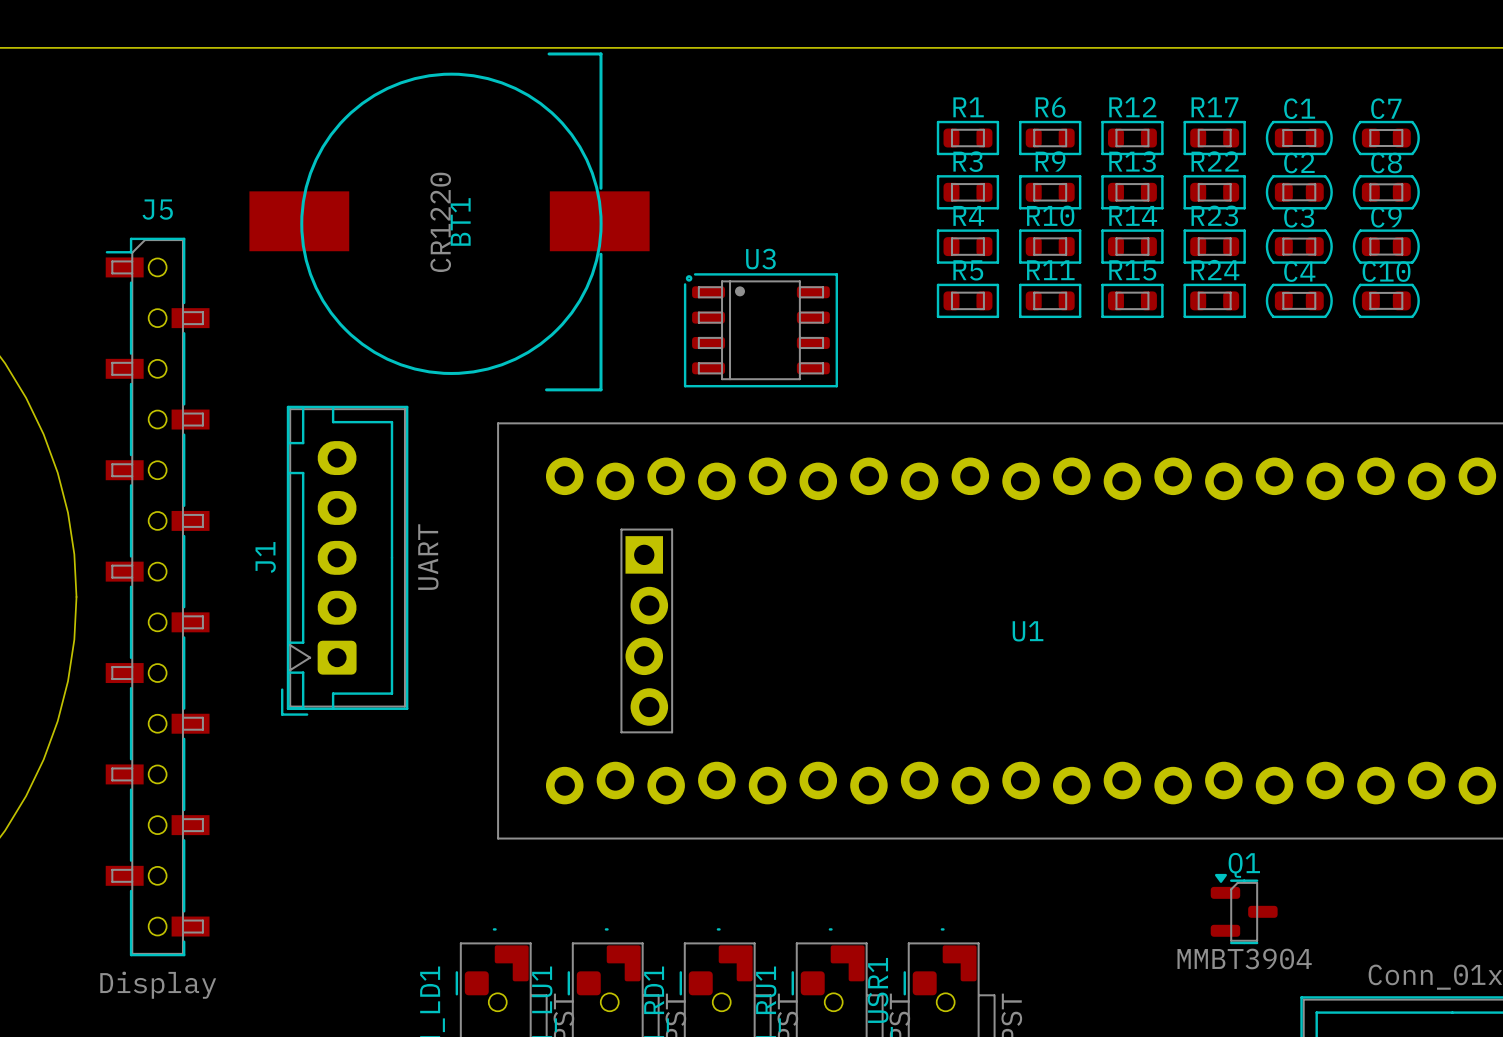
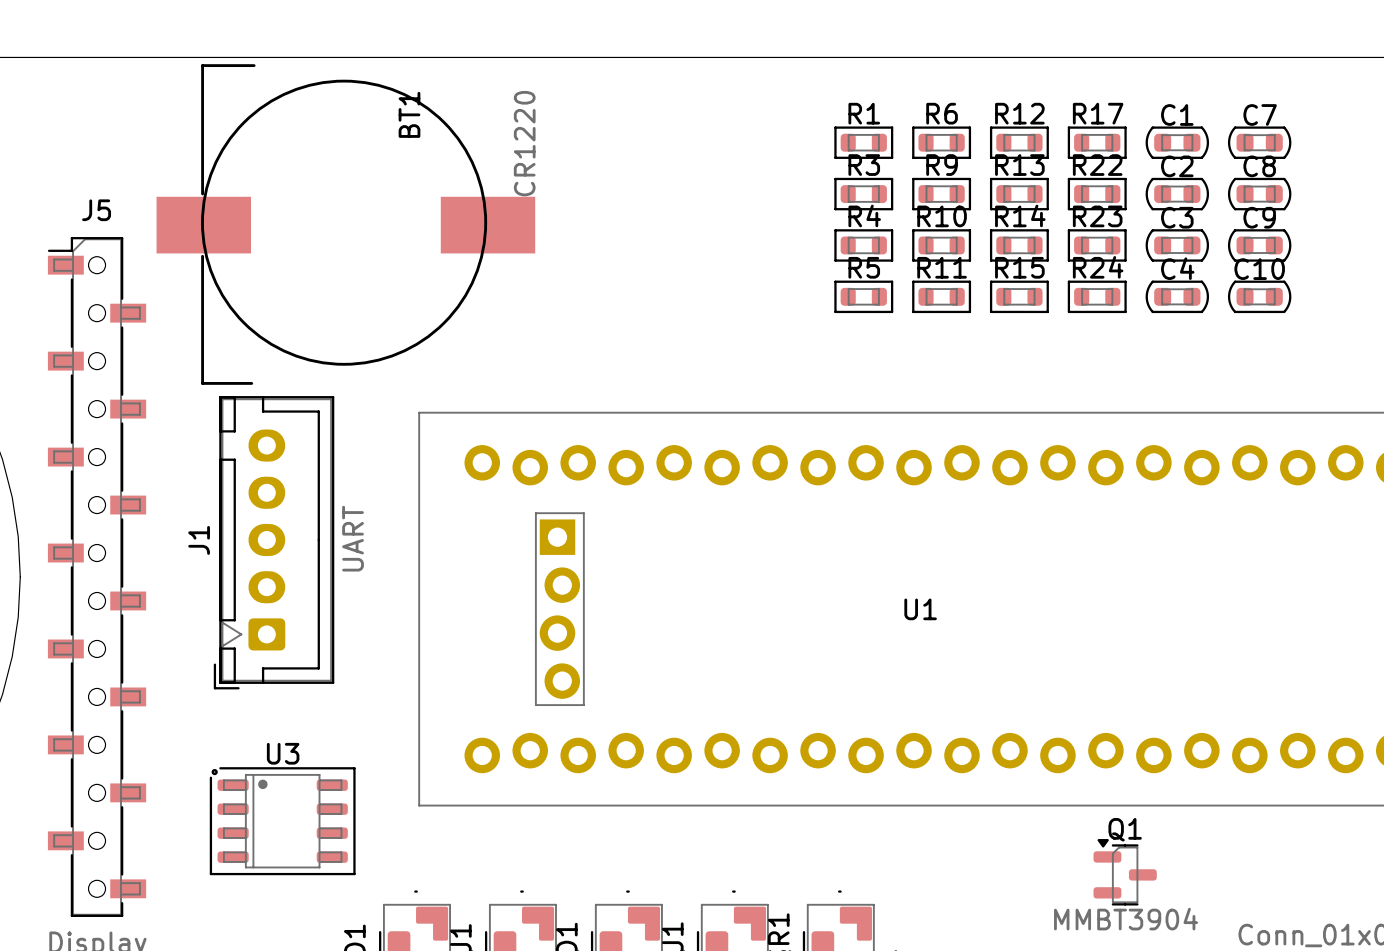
BT1 rotation: 0° (449, 221) -> 180° (345, 224)
BT1 name position: BT1 (460, 221) -> BT1 (409, 114)
BT1 value position: CR1220 (440, 222) -> CR1220 (524, 143)
U3 position: (760, 330) -> (282, 821)

